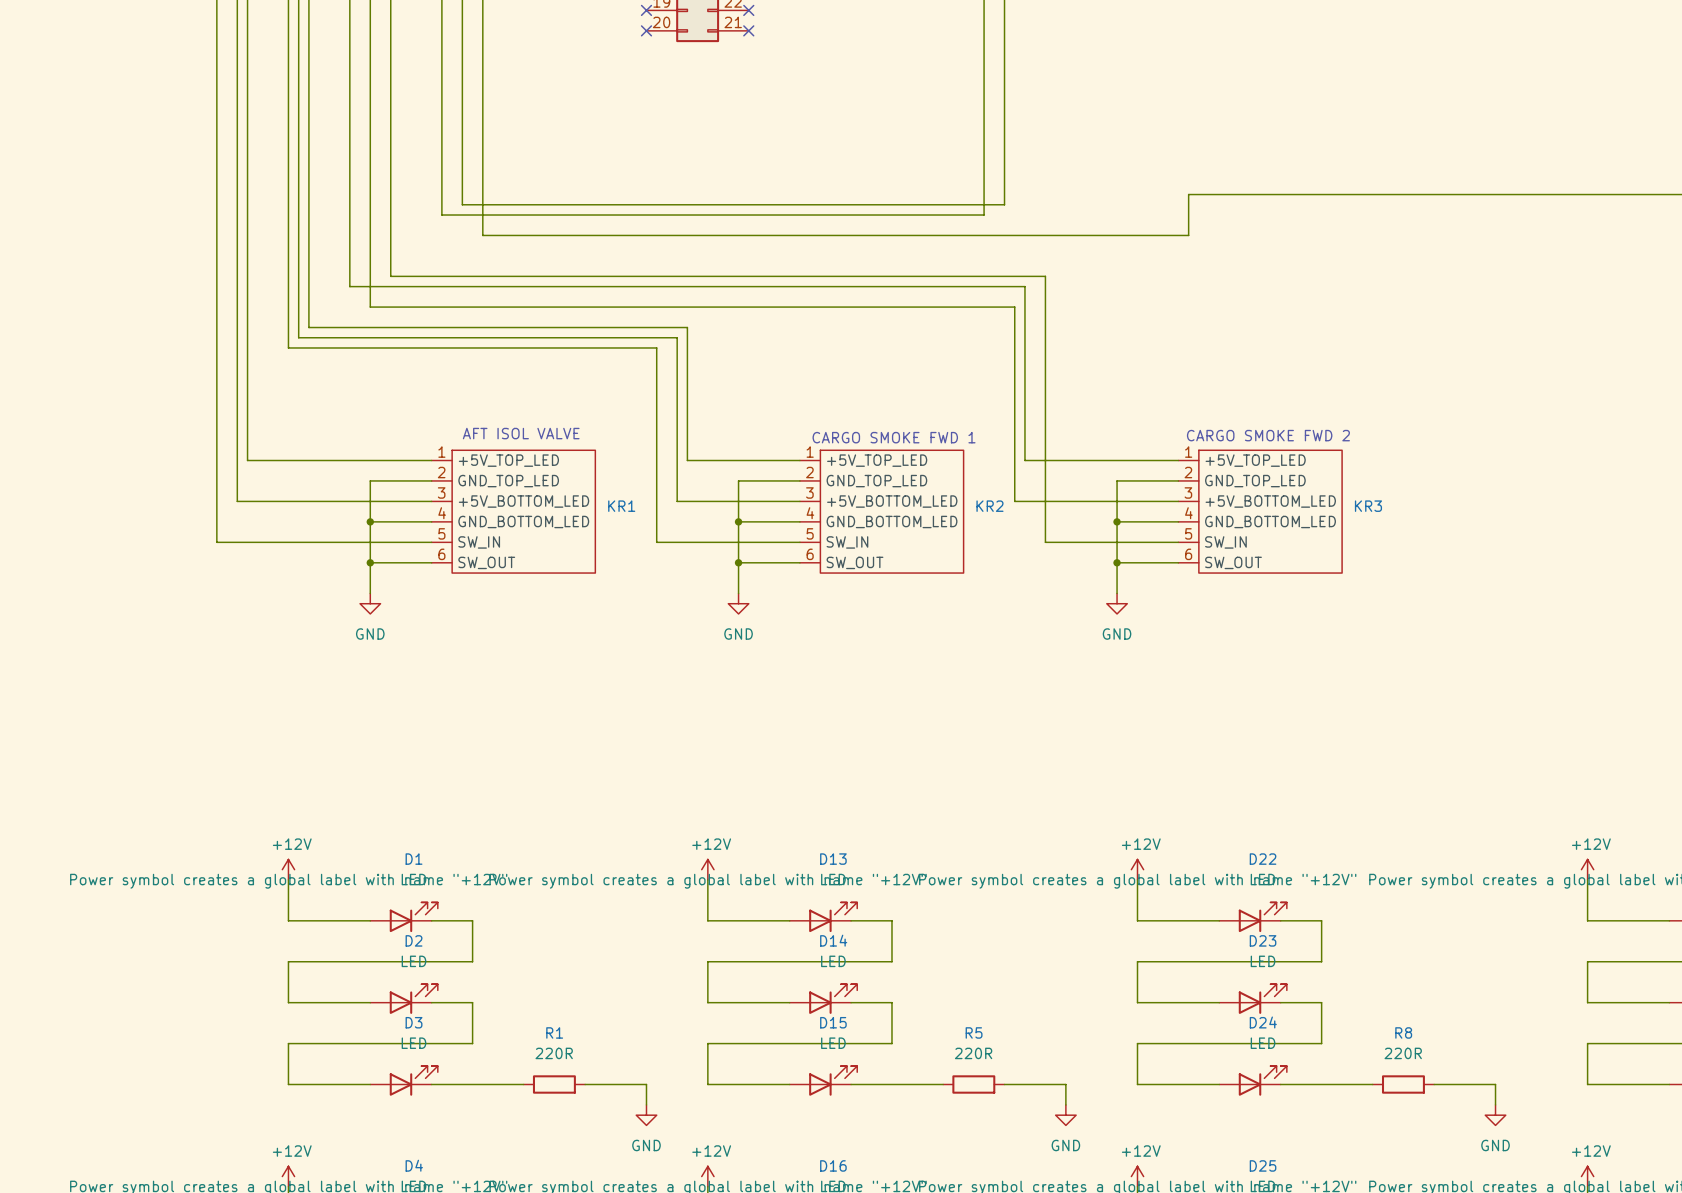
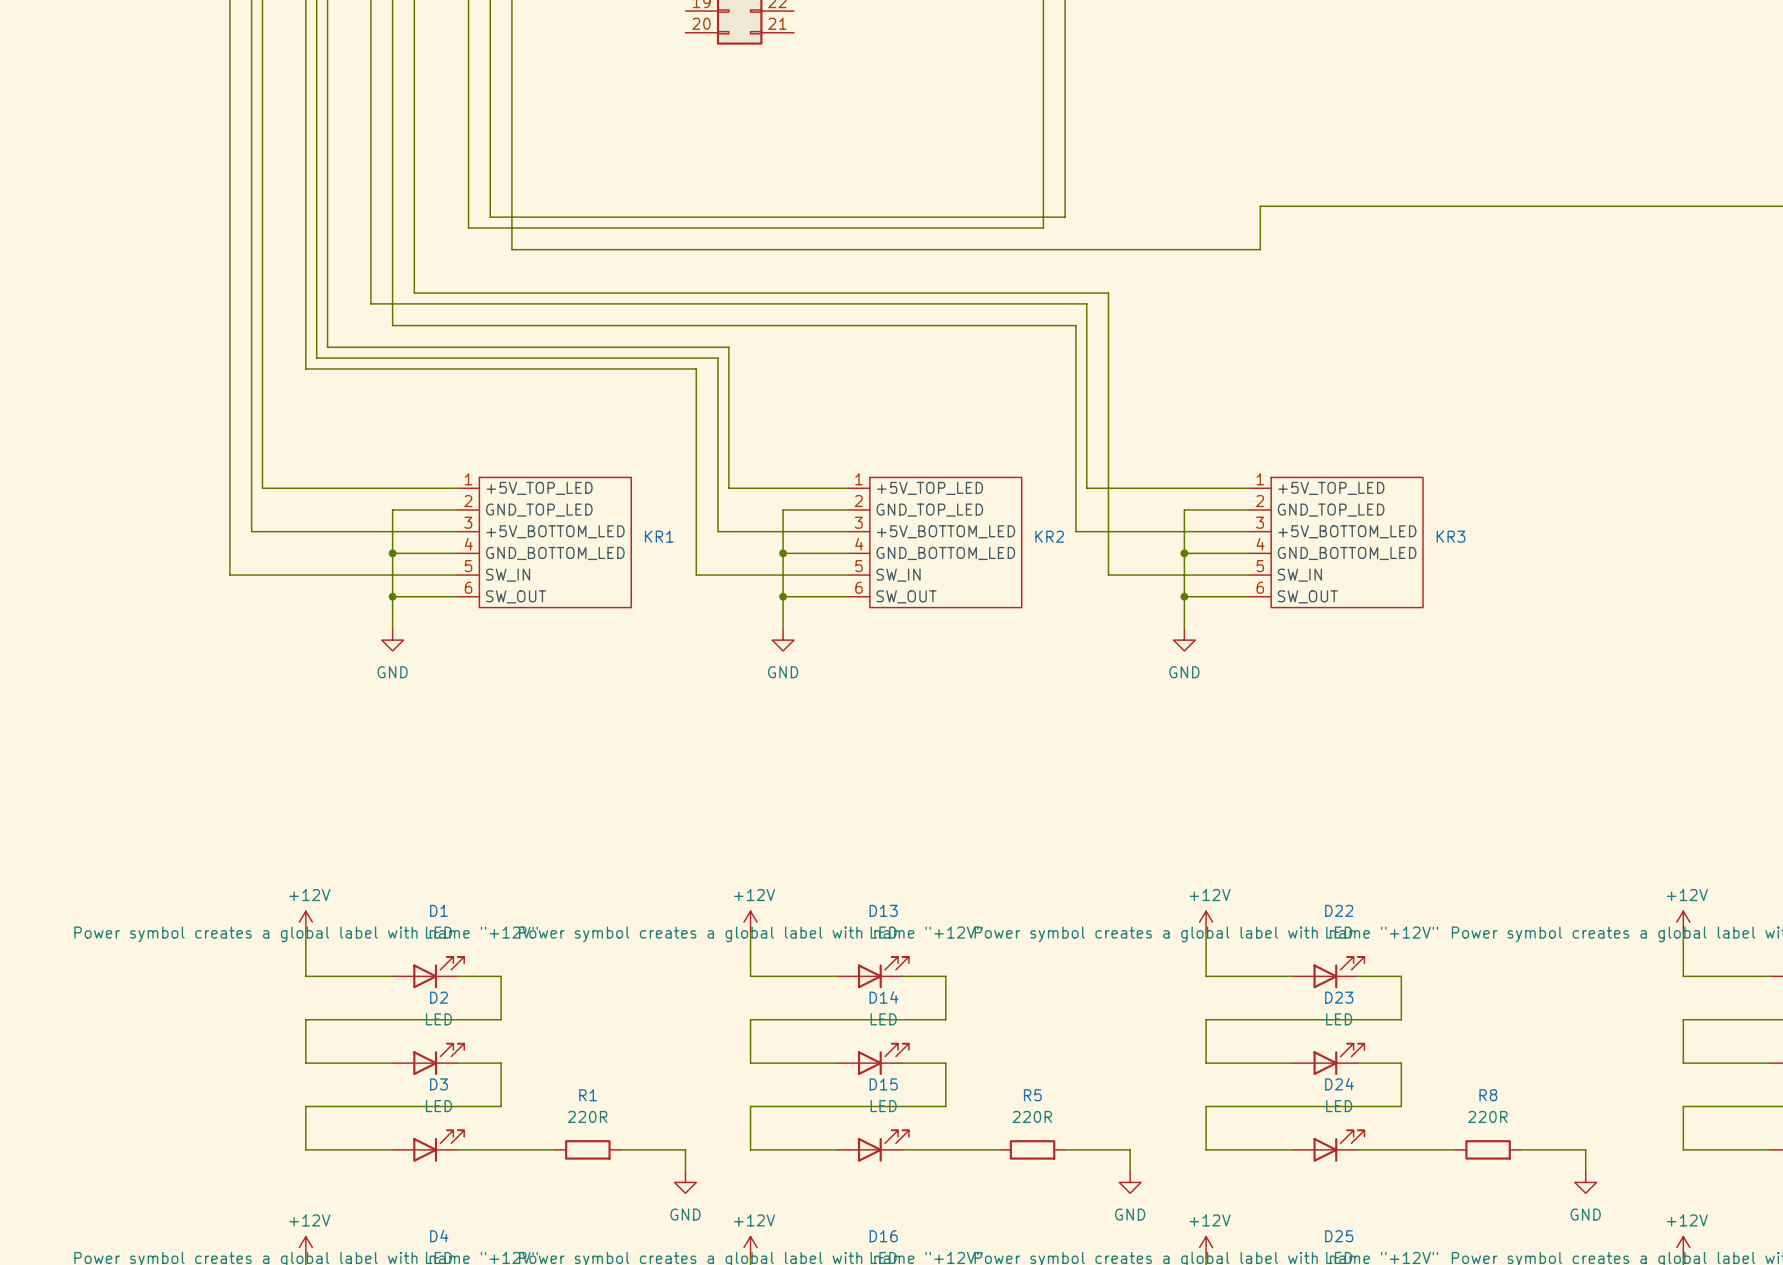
no-connect mark: (646, 10) -> none
no-connect mark: (748, 10) -> none
no-connect mark: (646, 30) -> none
no-connect mark: (748, 30) -> none
text: AFT ISOL VALVE (521, 433) -> none
text: CARGO SMOKE FWD 2 (1268, 435) -> none
text: CARGO SMOKE FWD 1 (894, 437) -> none

